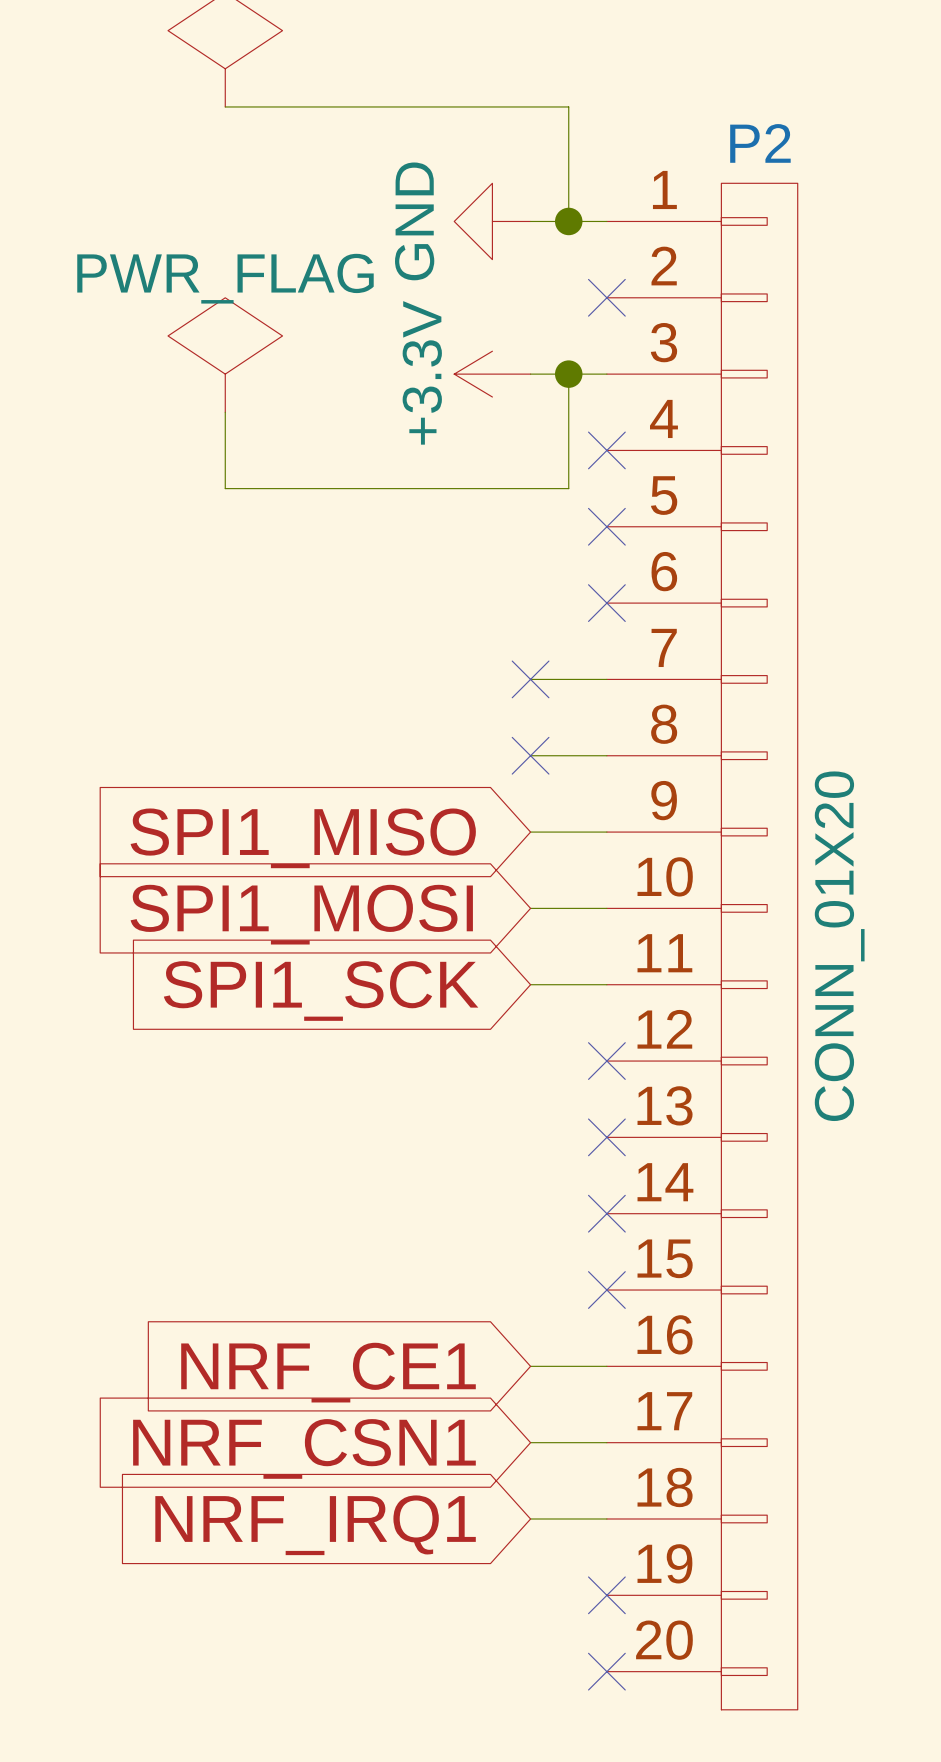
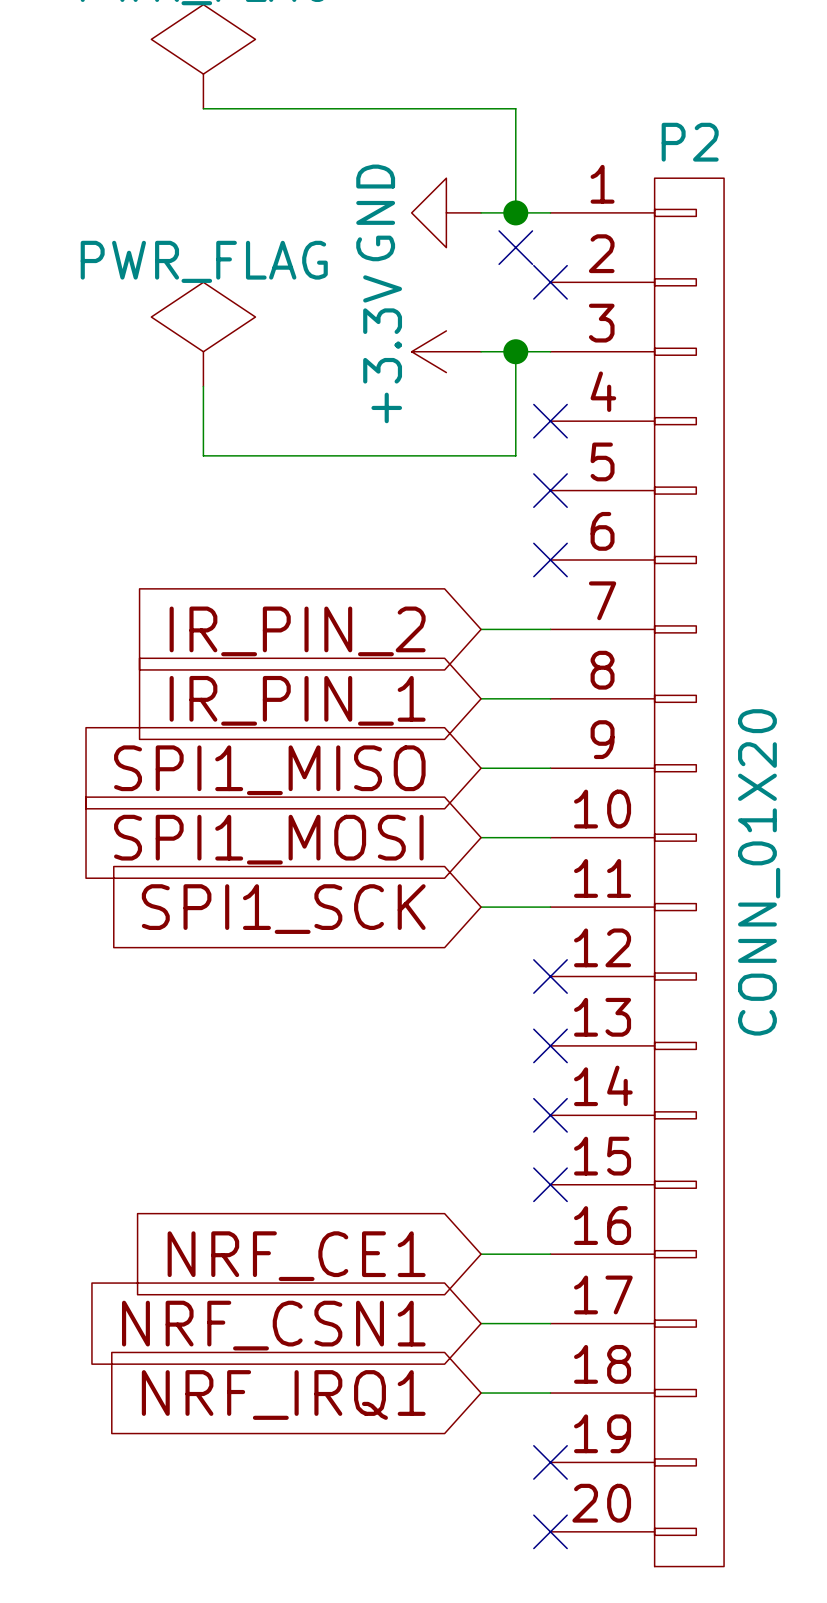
no-connect mark: none -> (515, 247)
no-connect mark: (530, 679) -> none
global label: none -> IR_PIN_2 (297, 631)
no-connect mark: (530, 755) -> none
global label: none -> IR_PIN_1 (297, 700)

